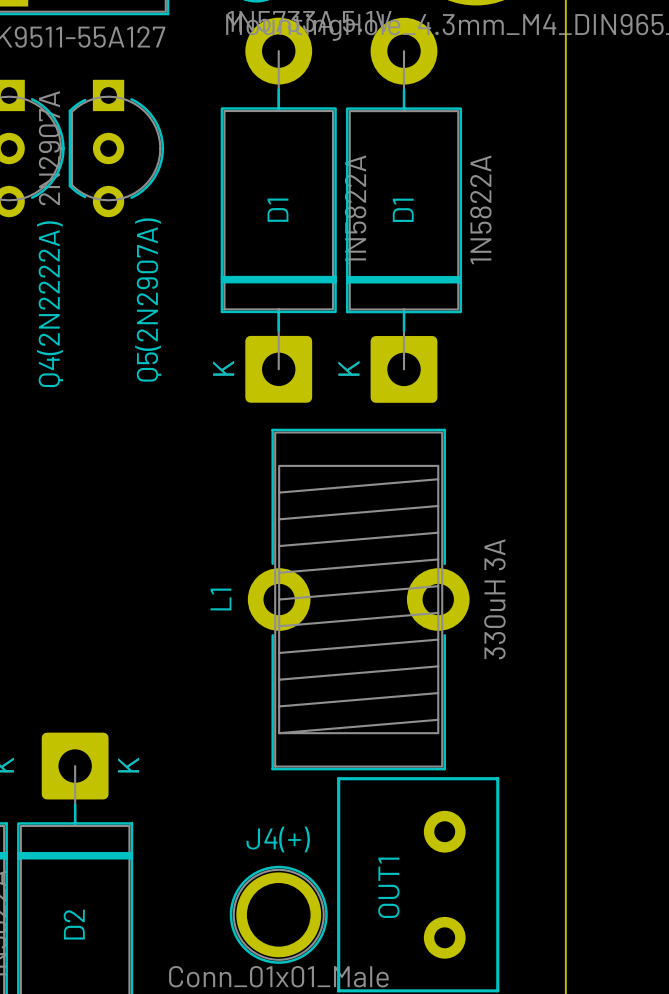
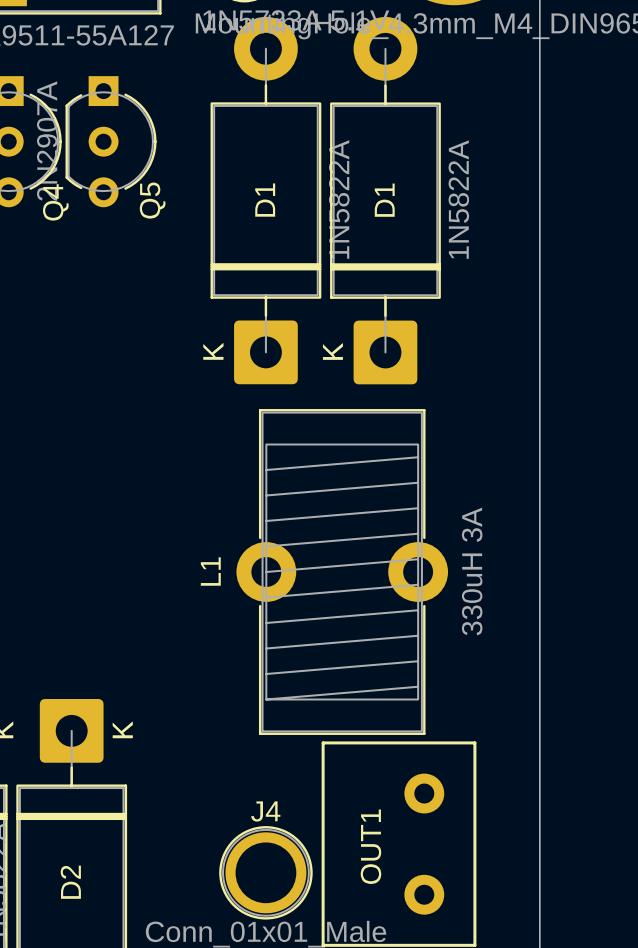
Q5(2N2907A) name: Q5(2N2907A) (148, 300) -> Q5 (152, 200)
Q4(2N2222A) name: Q4(2N2222A) (50, 304) -> Q4 (55, 202)
J4(+) name: J4(+) (278, 839) -> J4 (265, 811)

